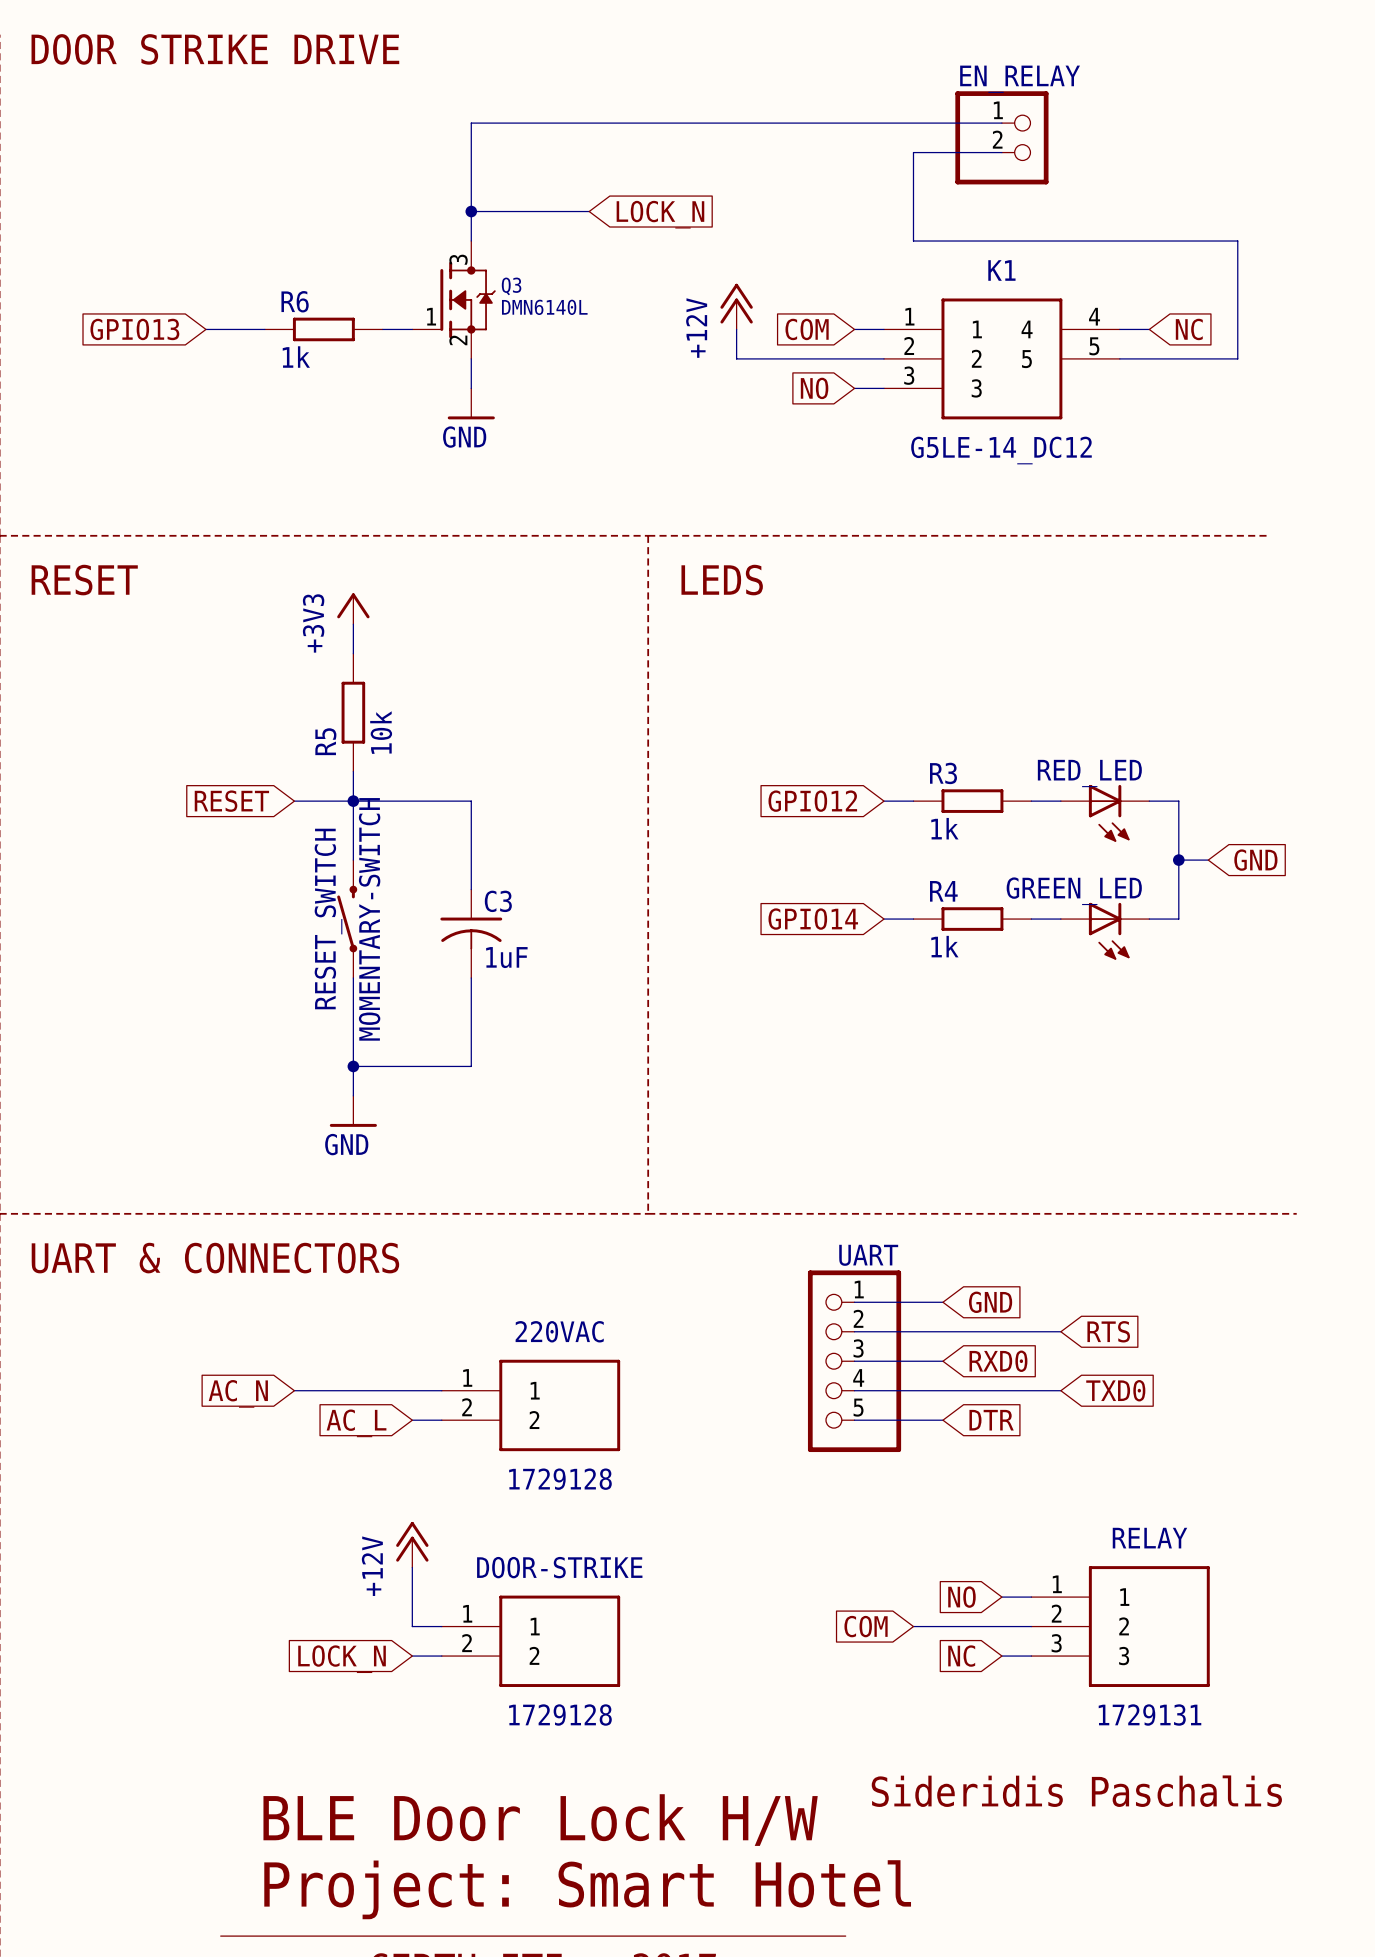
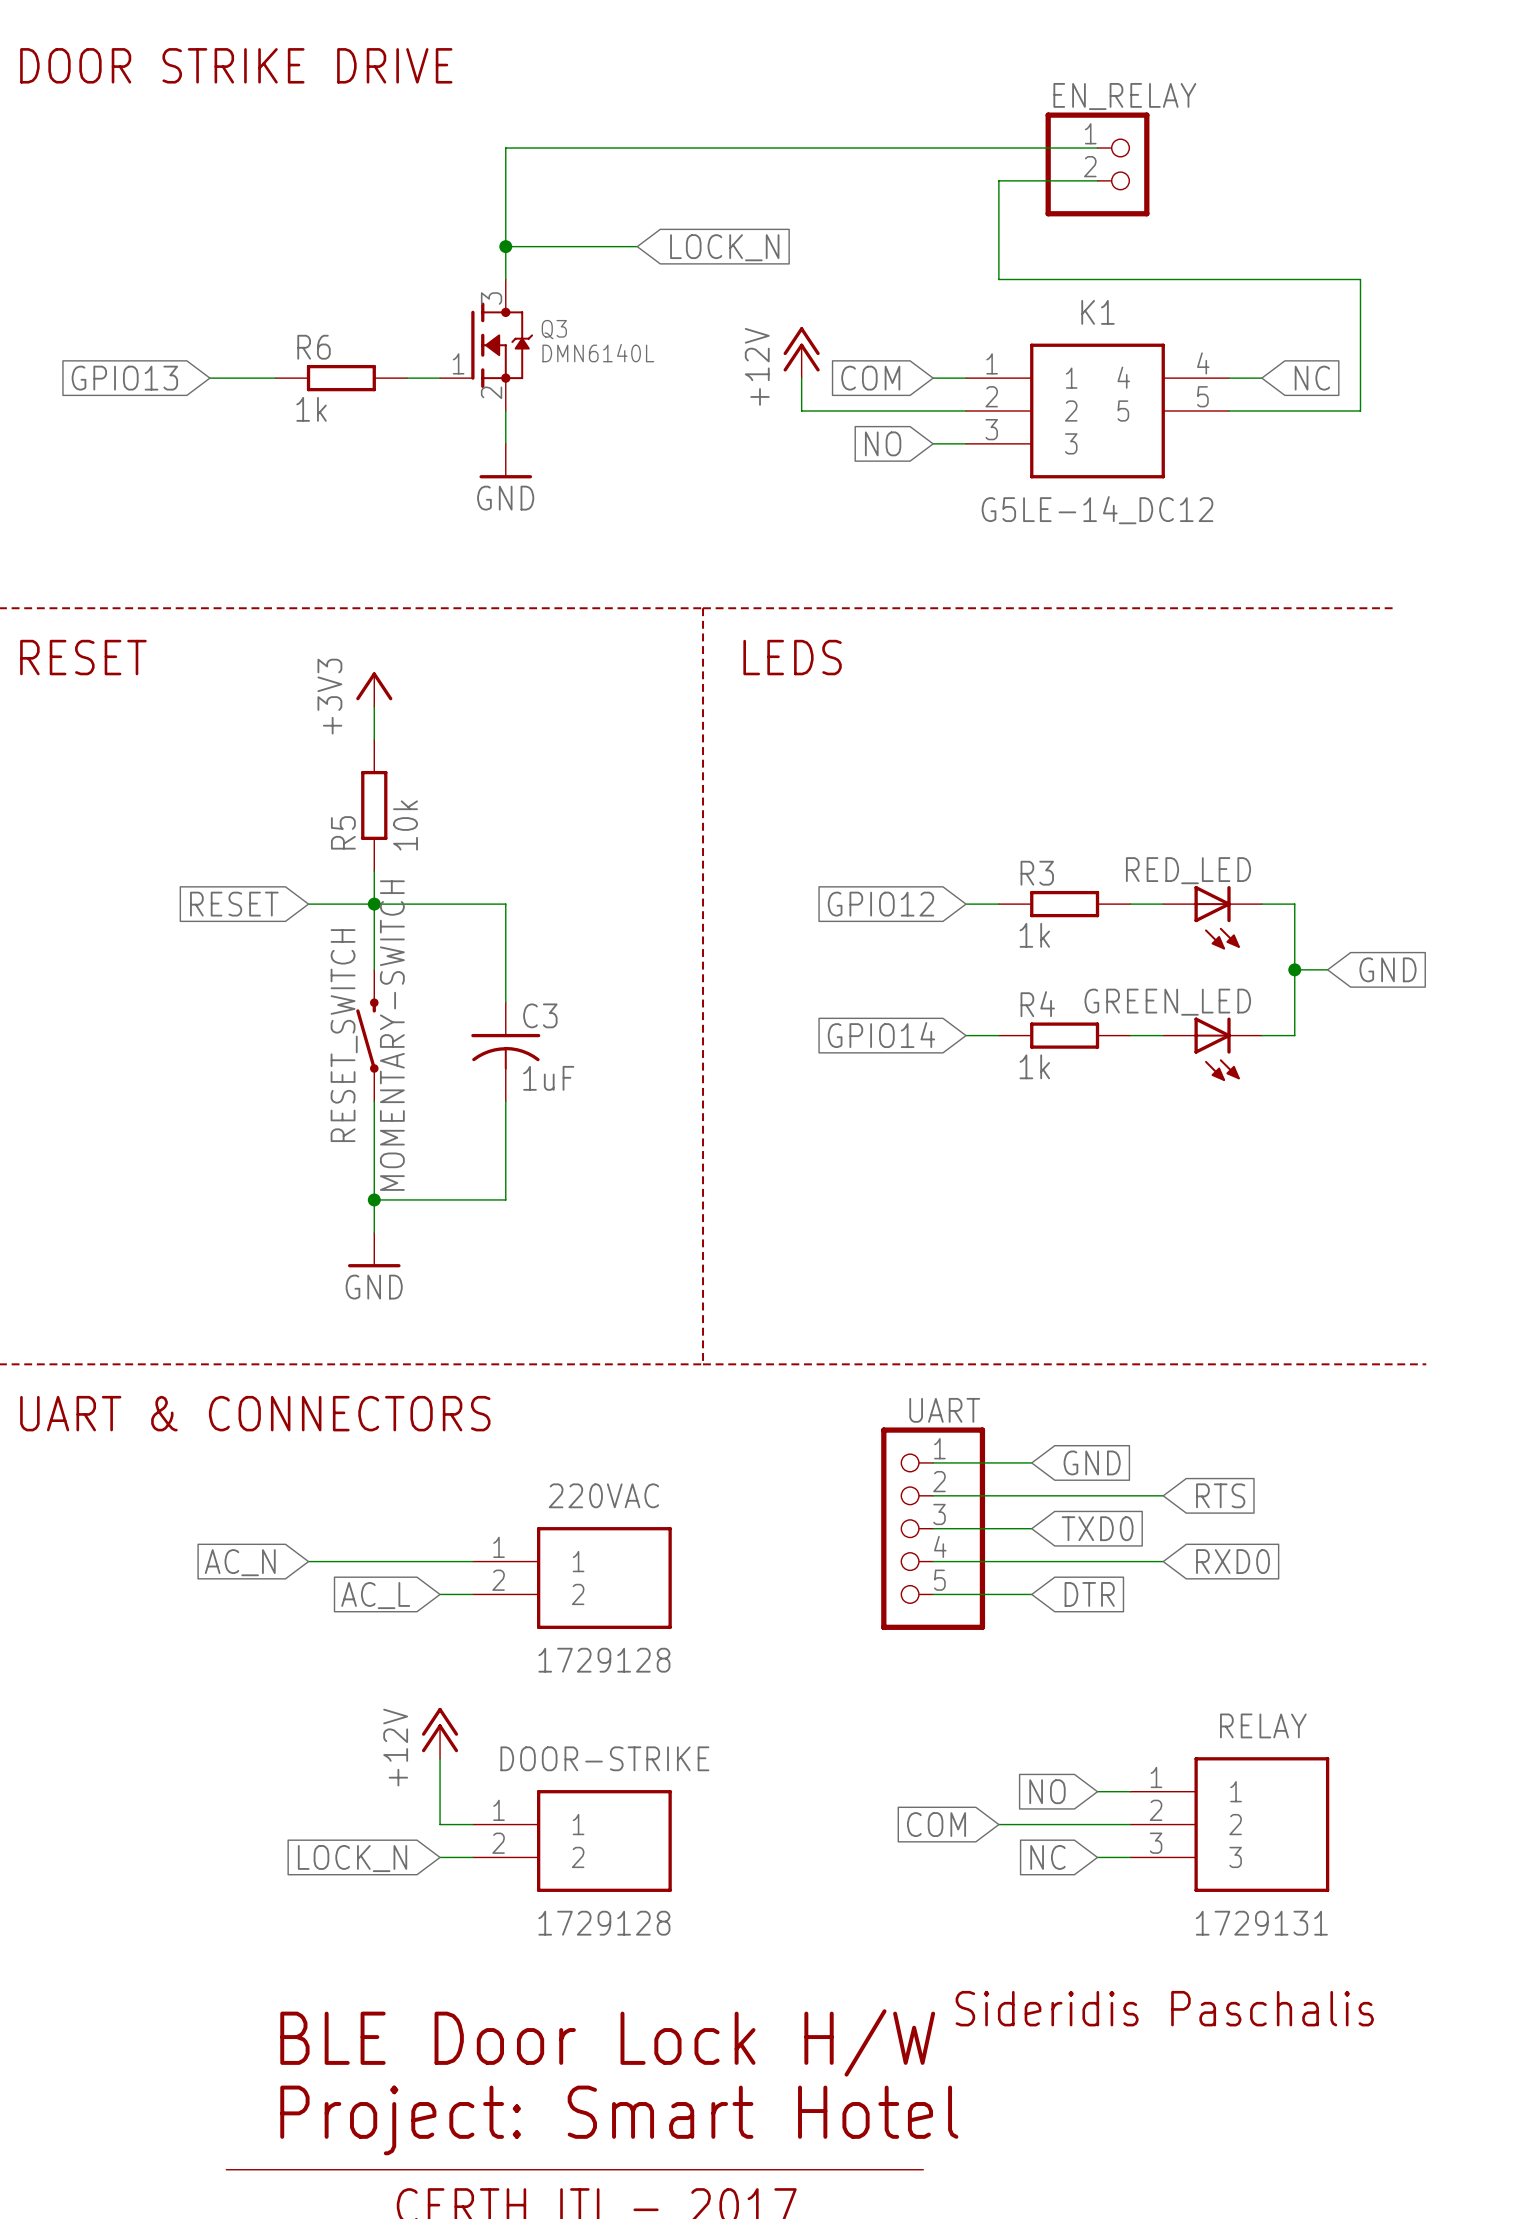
global label: RXD0 (998, 1361) -> TXD0 (1097, 1528)
global label: TXD0 (1115, 1390) -> RXD0 (1233, 1561)

